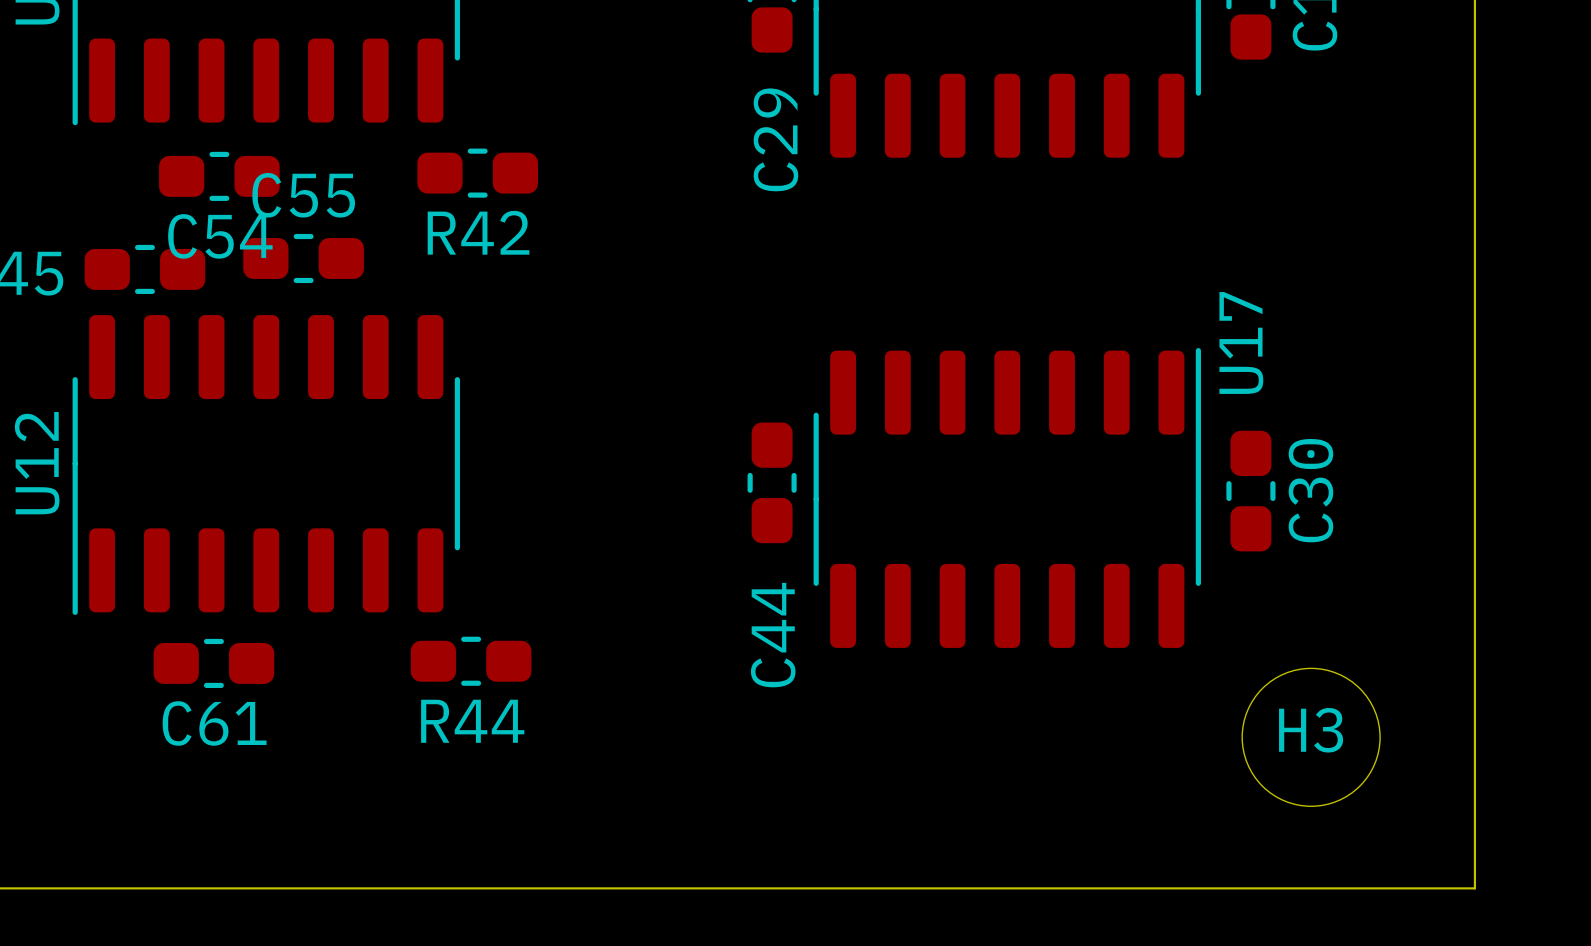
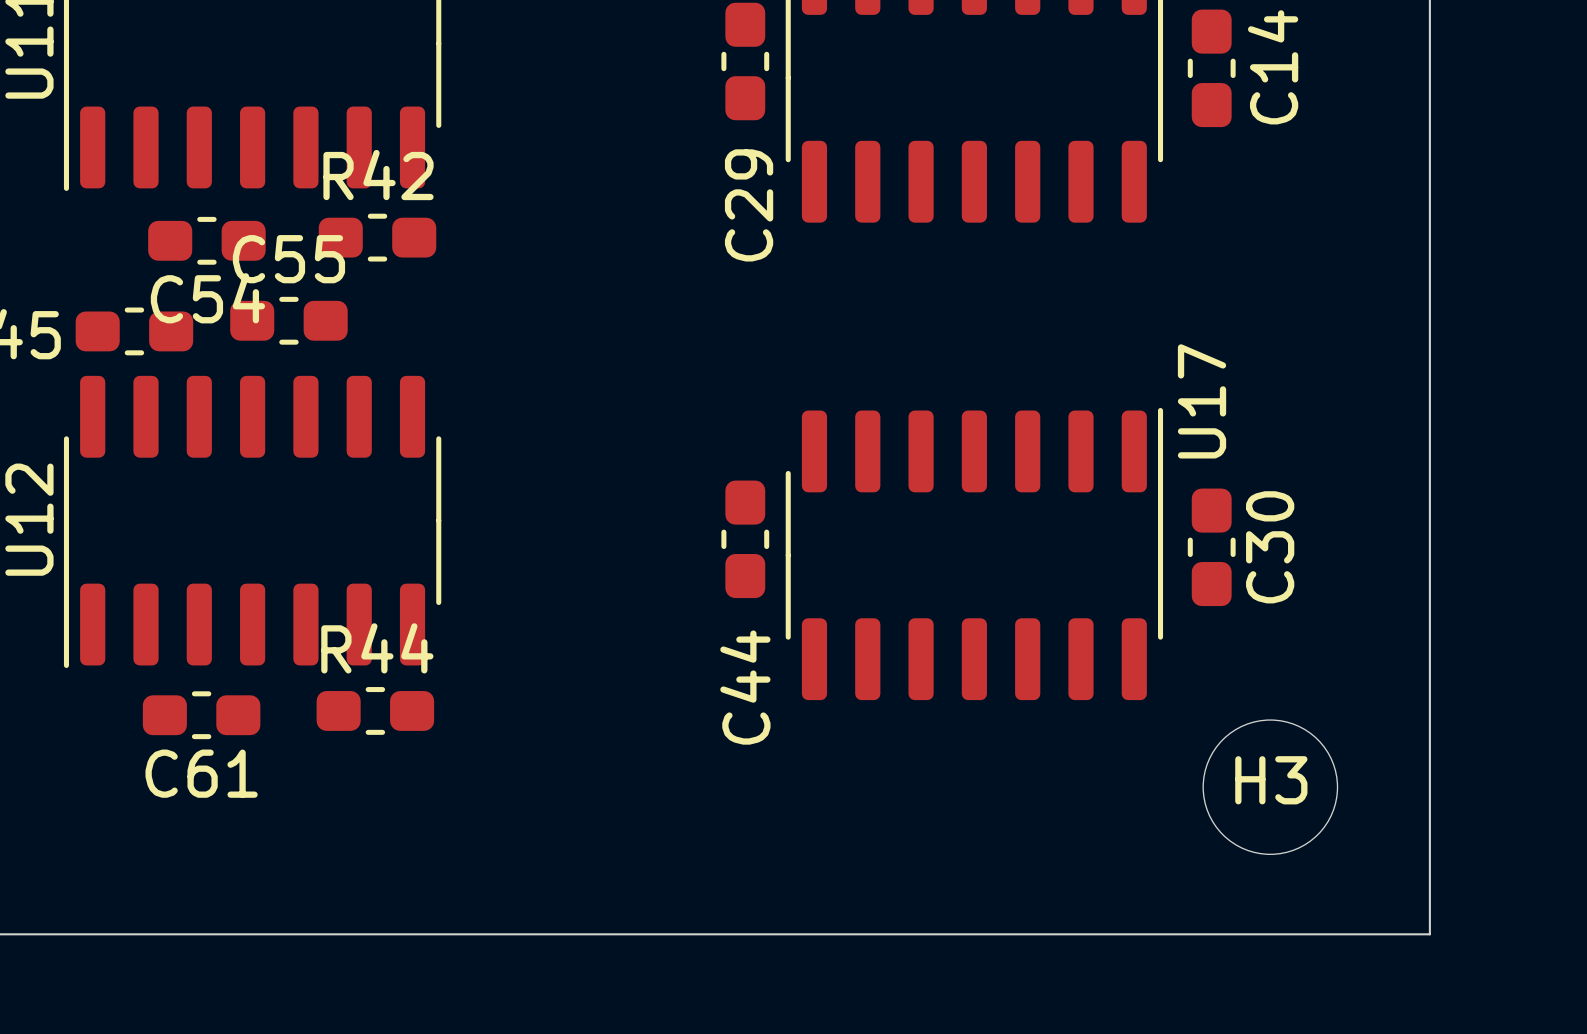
R42 position: (477, 173) -> (377, 237)
R42 name position: R42 (478, 232) -> R42 (378, 175)
R44 position: (471, 661) -> (375, 710)
R44 name position: R44 (472, 721) -> R44 (377, 648)

